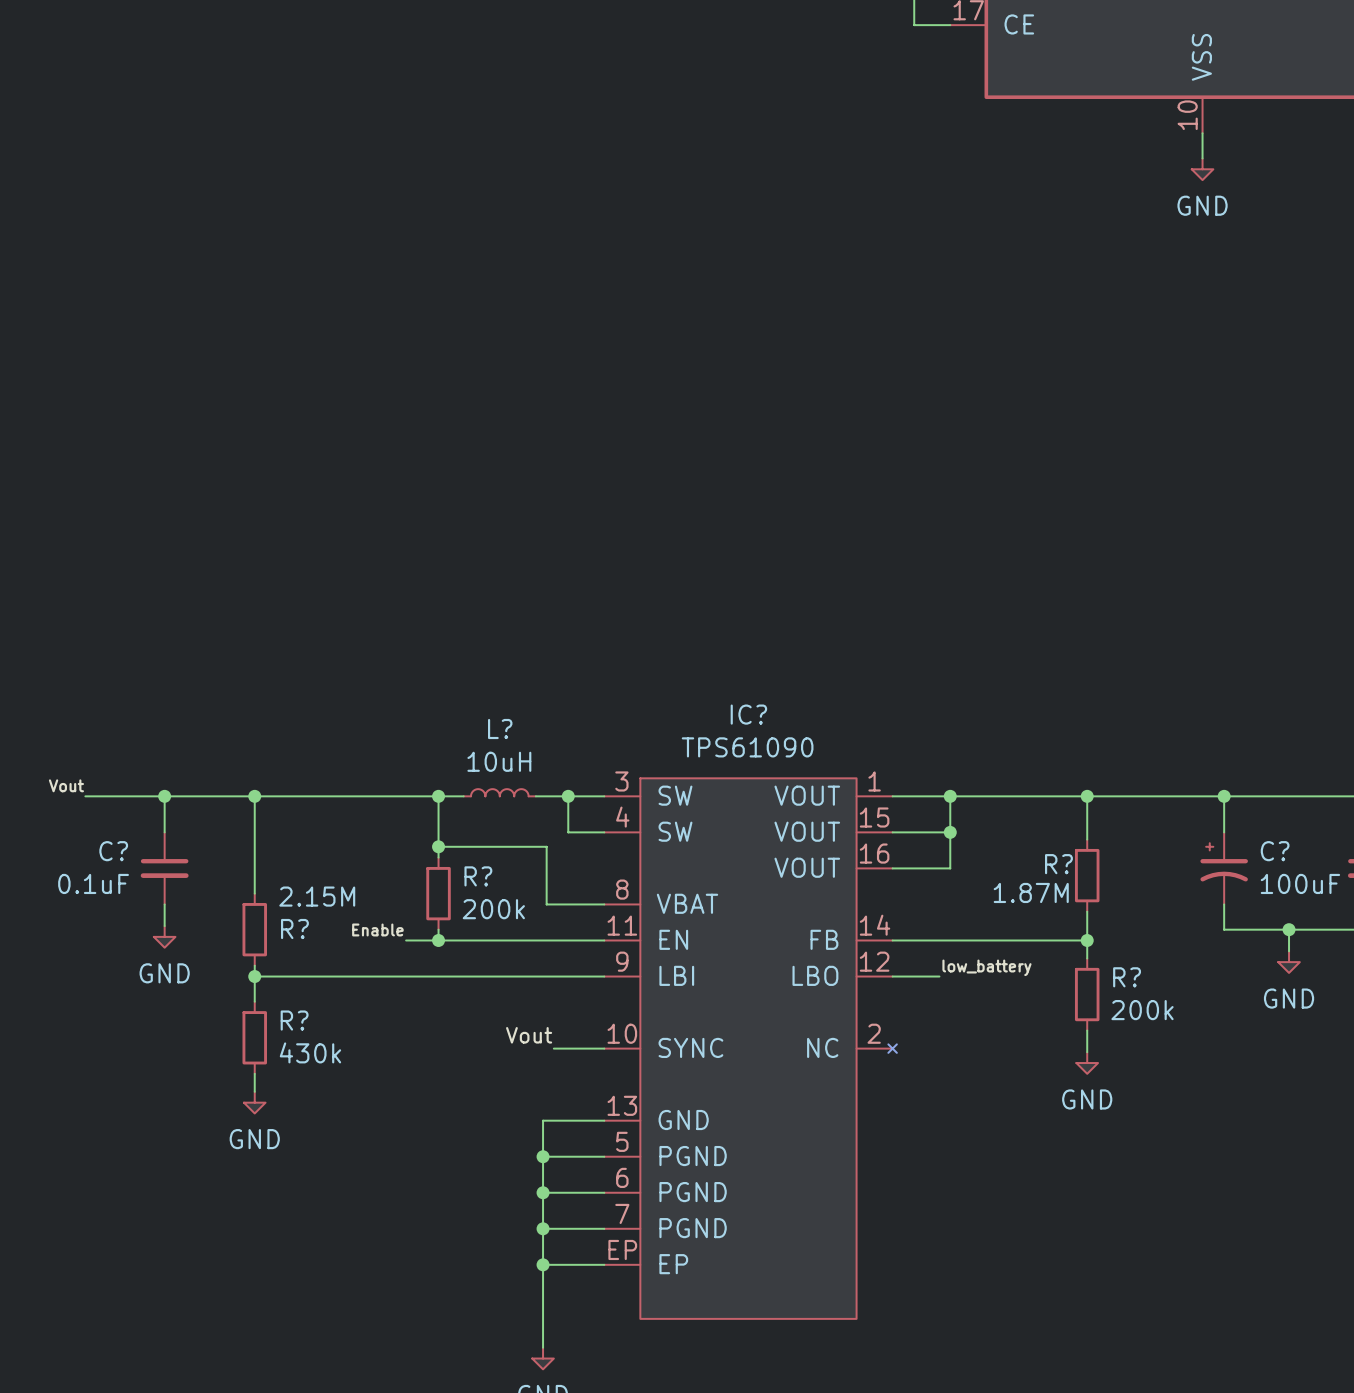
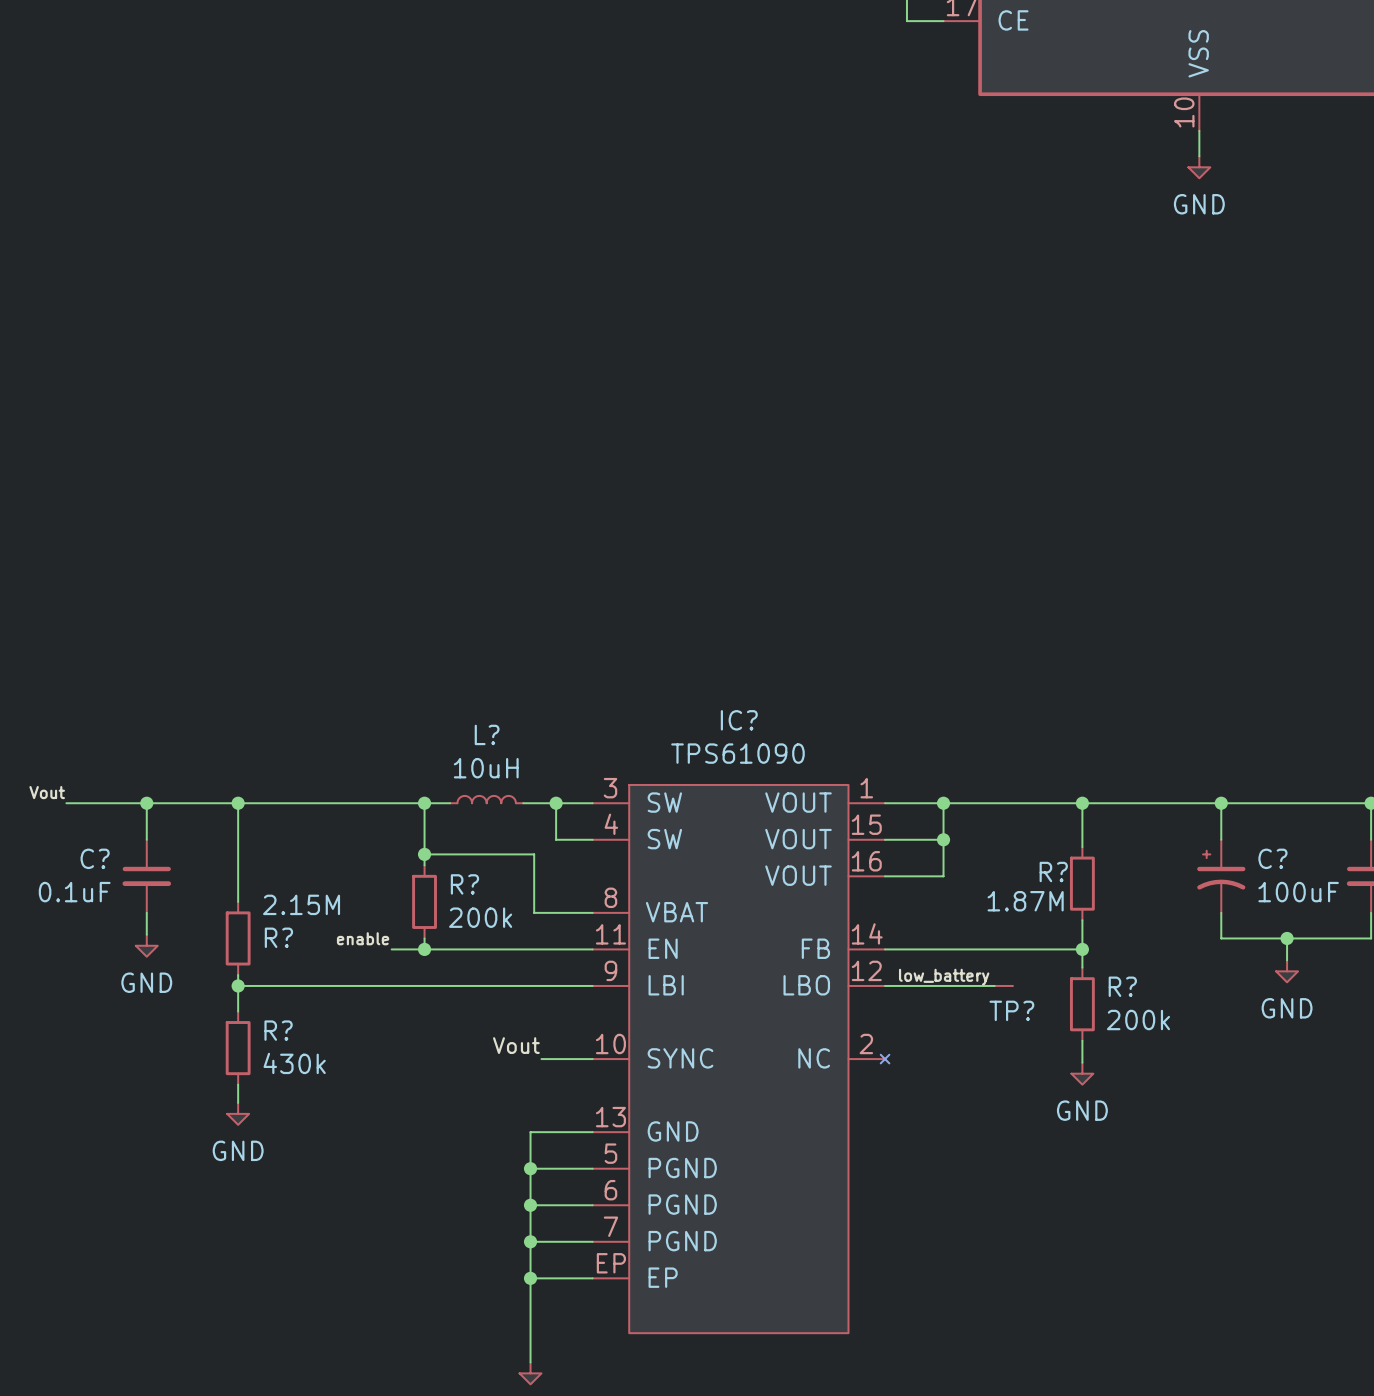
label: Enable (377, 929) -> enable (363, 938)
label position: low_battery (986, 967) -> low_battery (944, 977)
wire: none -> (932, 985) (994, 985)
TP?: none -> (1007, 985)

